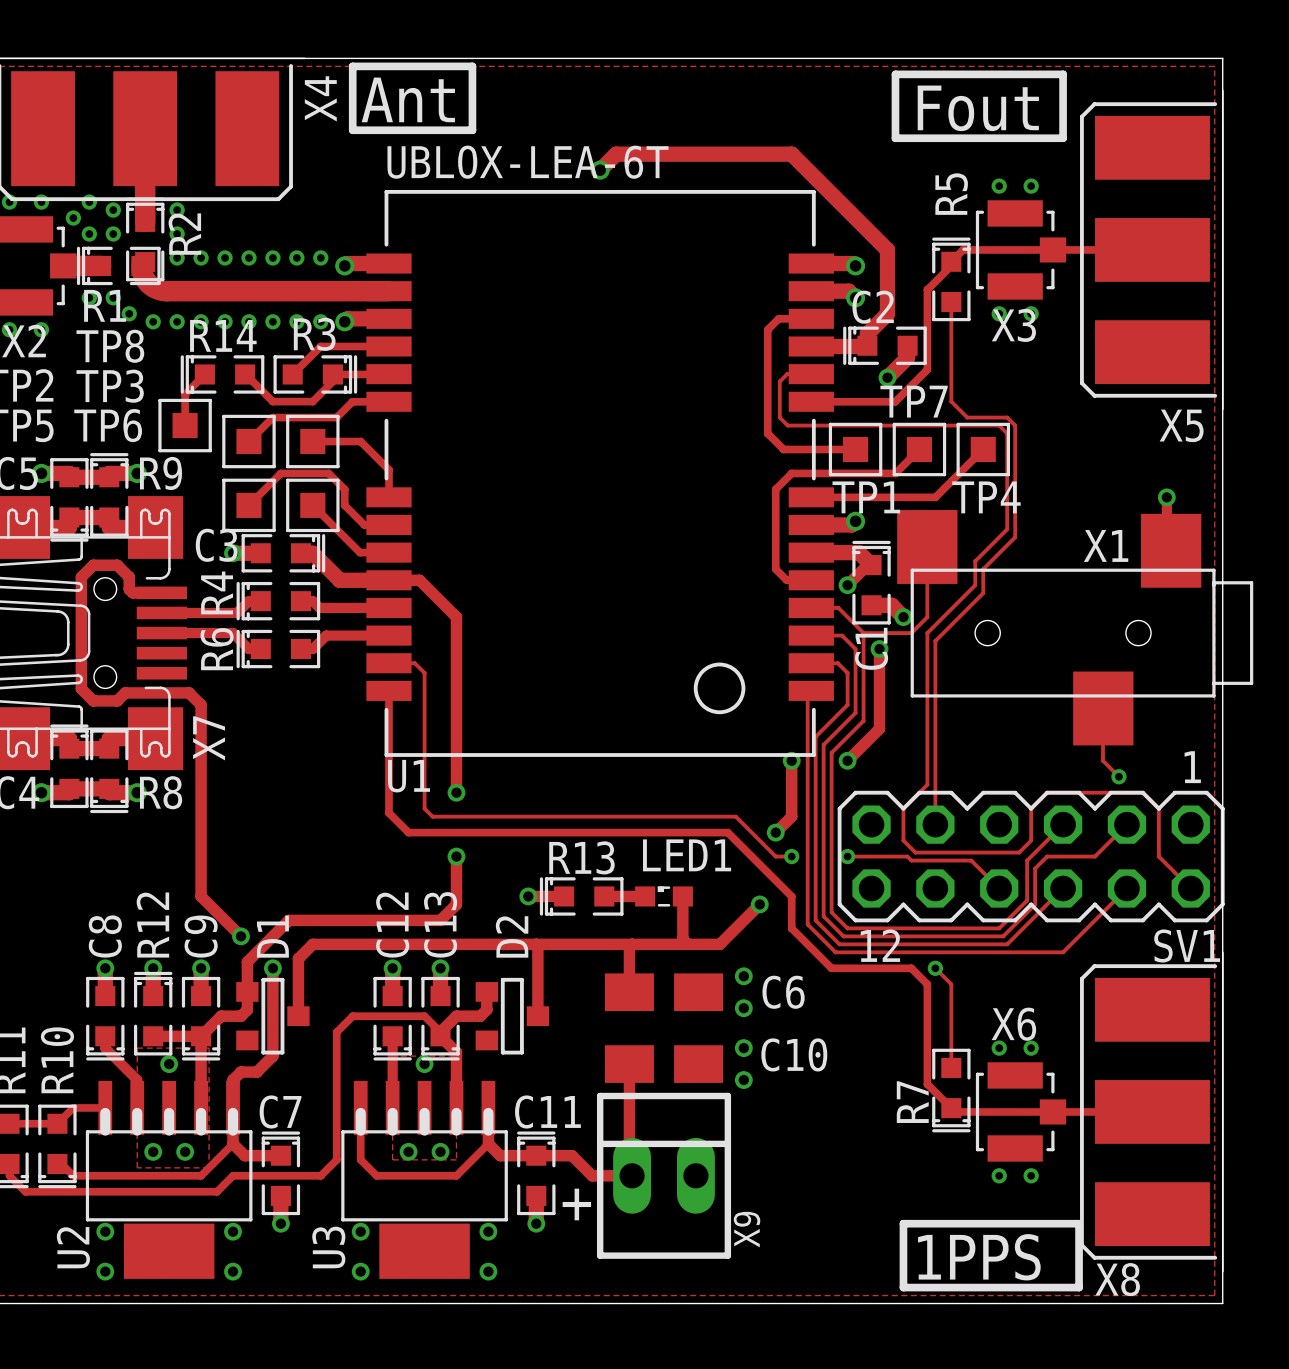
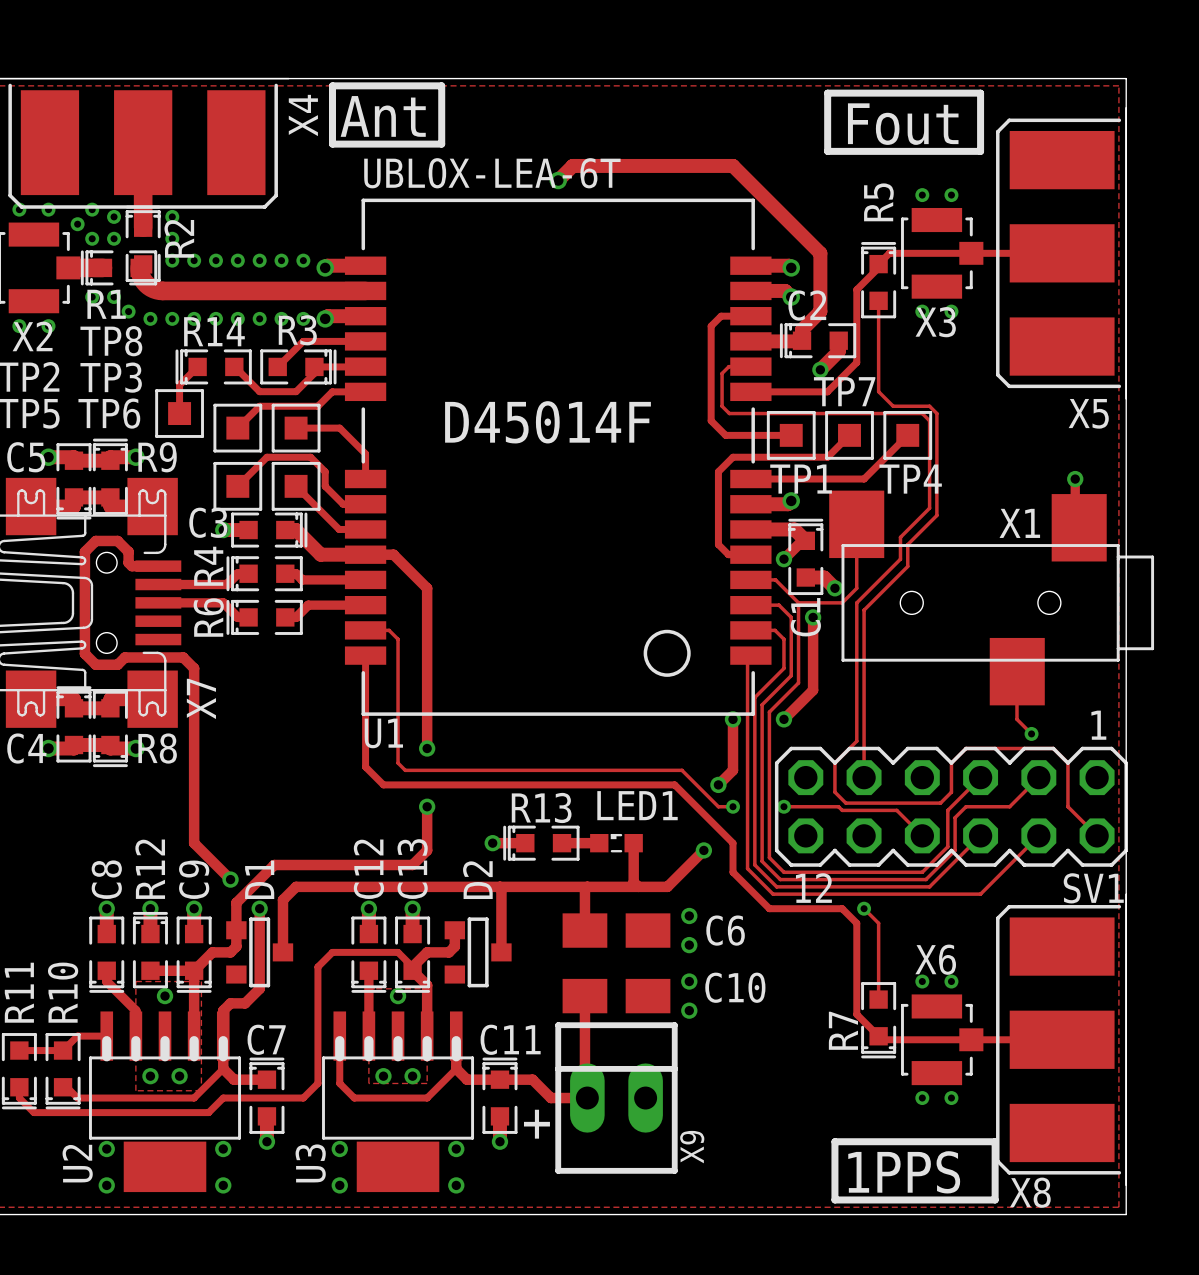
text: none -> D45014F (547, 422)

